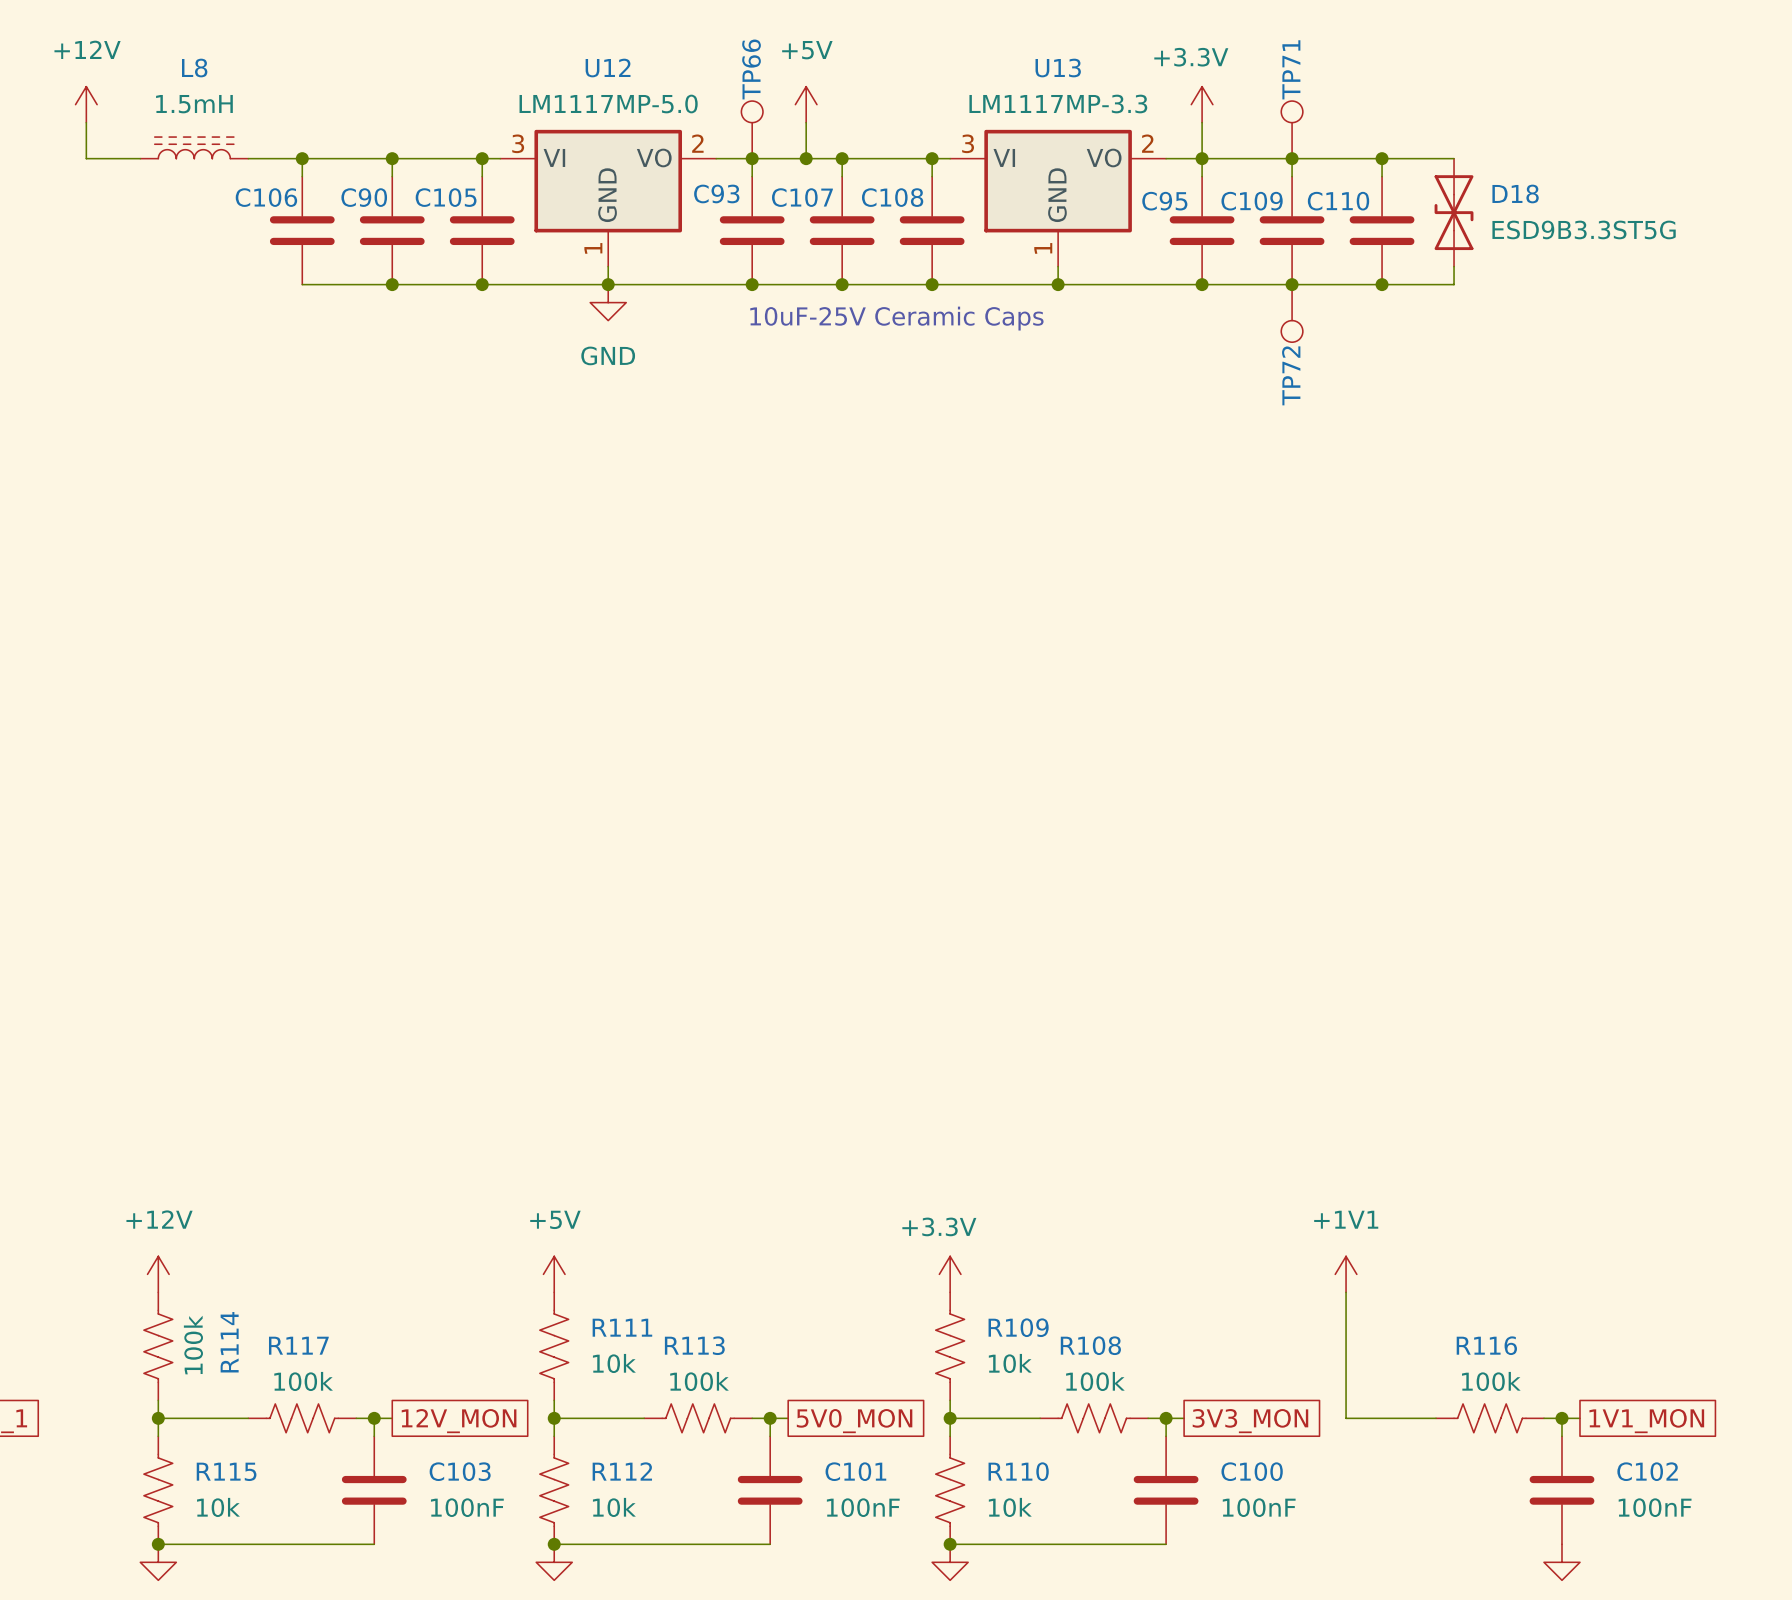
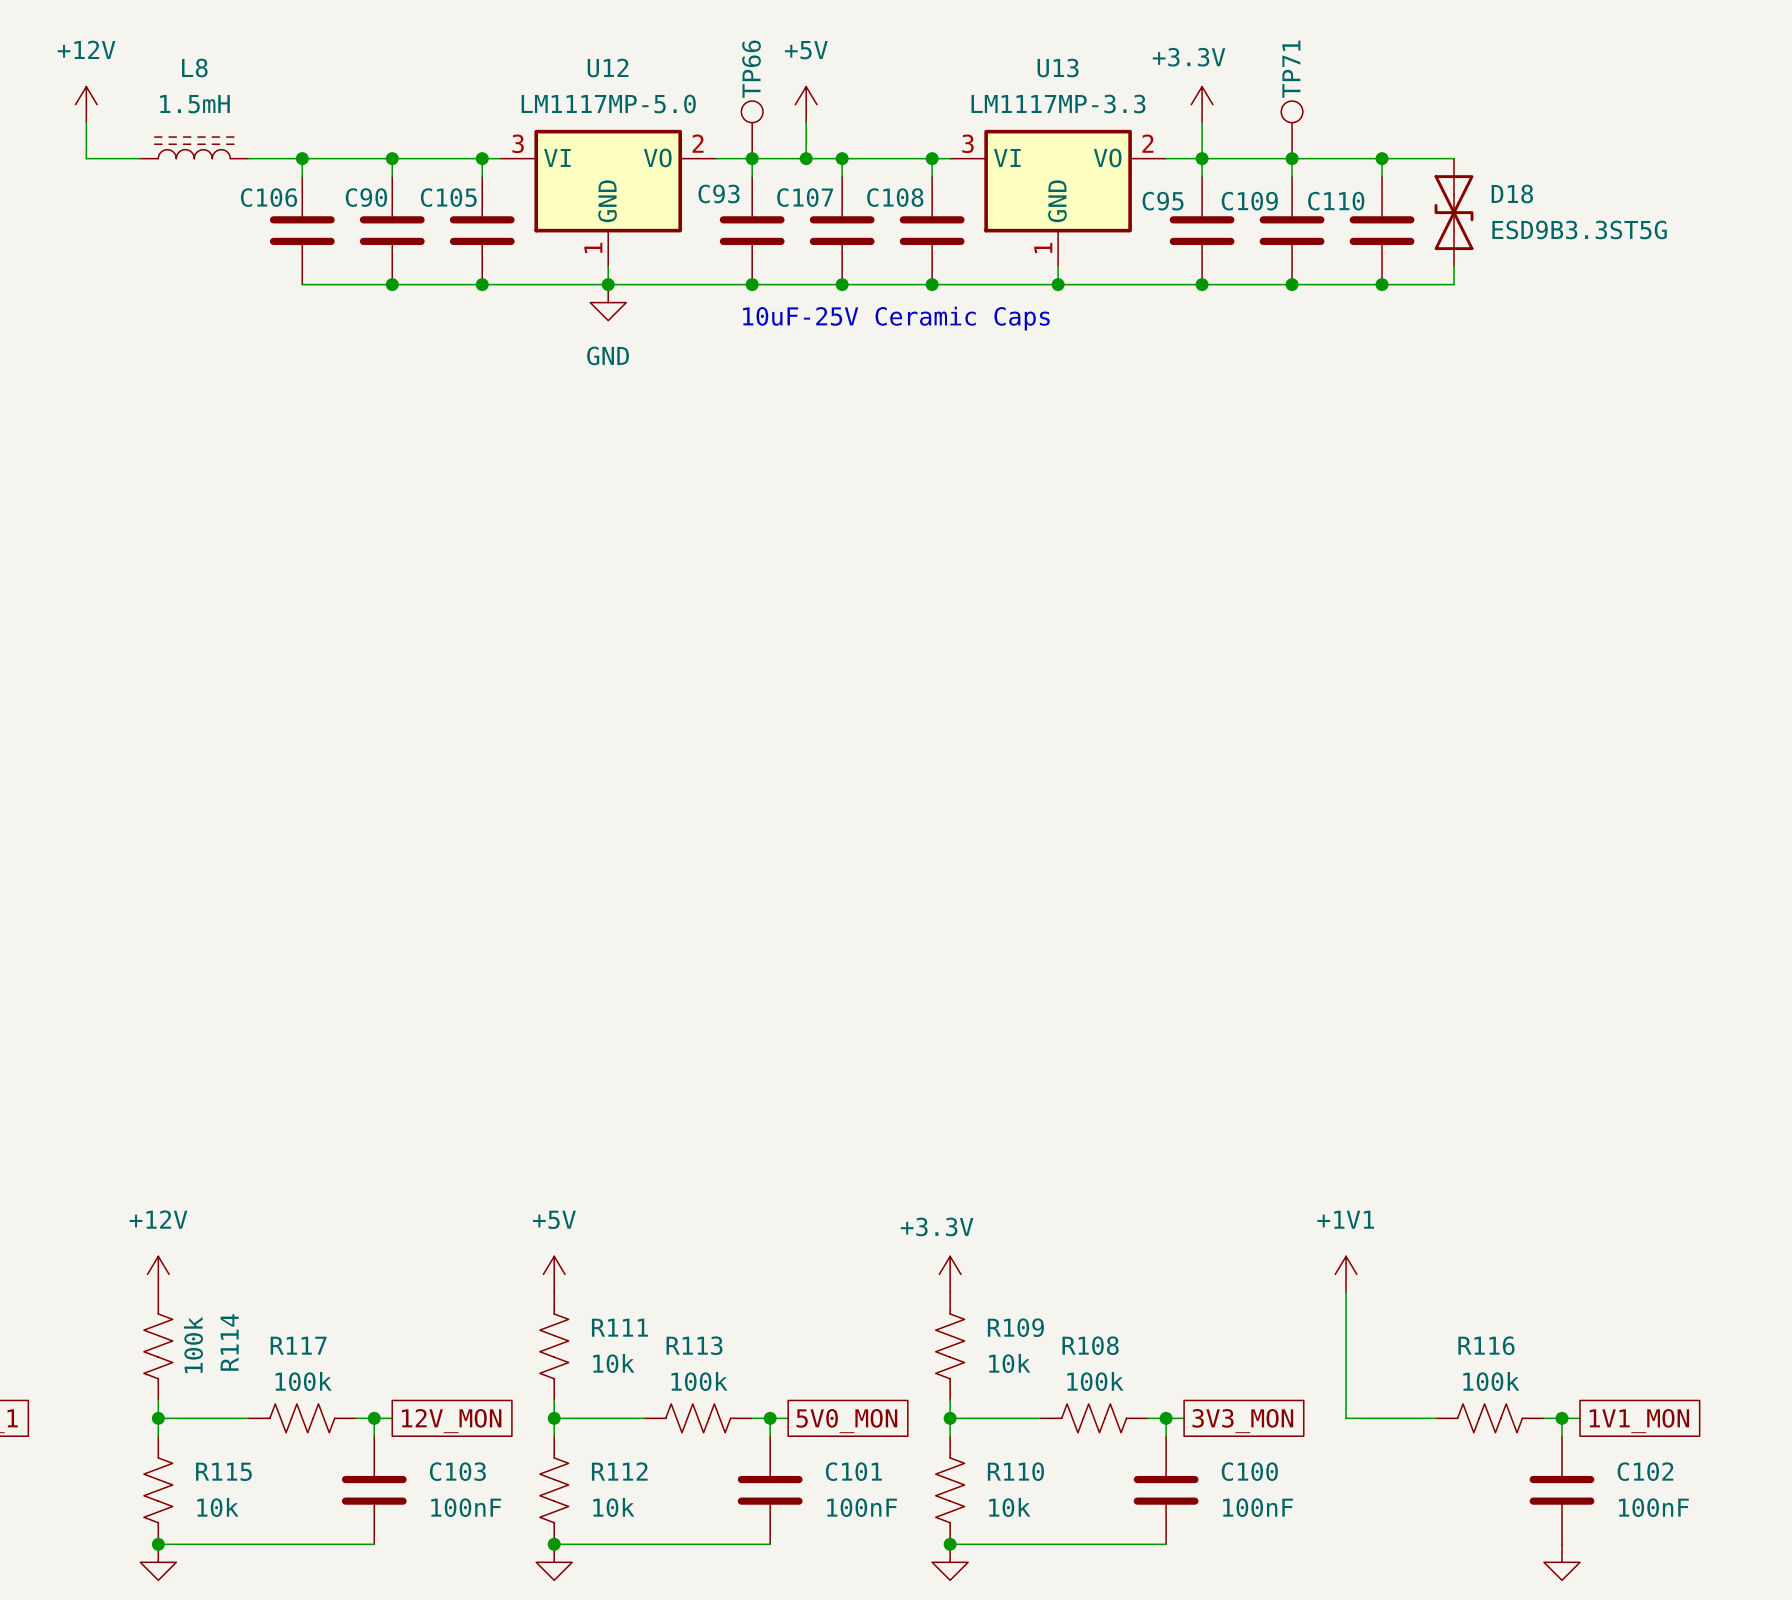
TP72: (1292, 313) -> none

